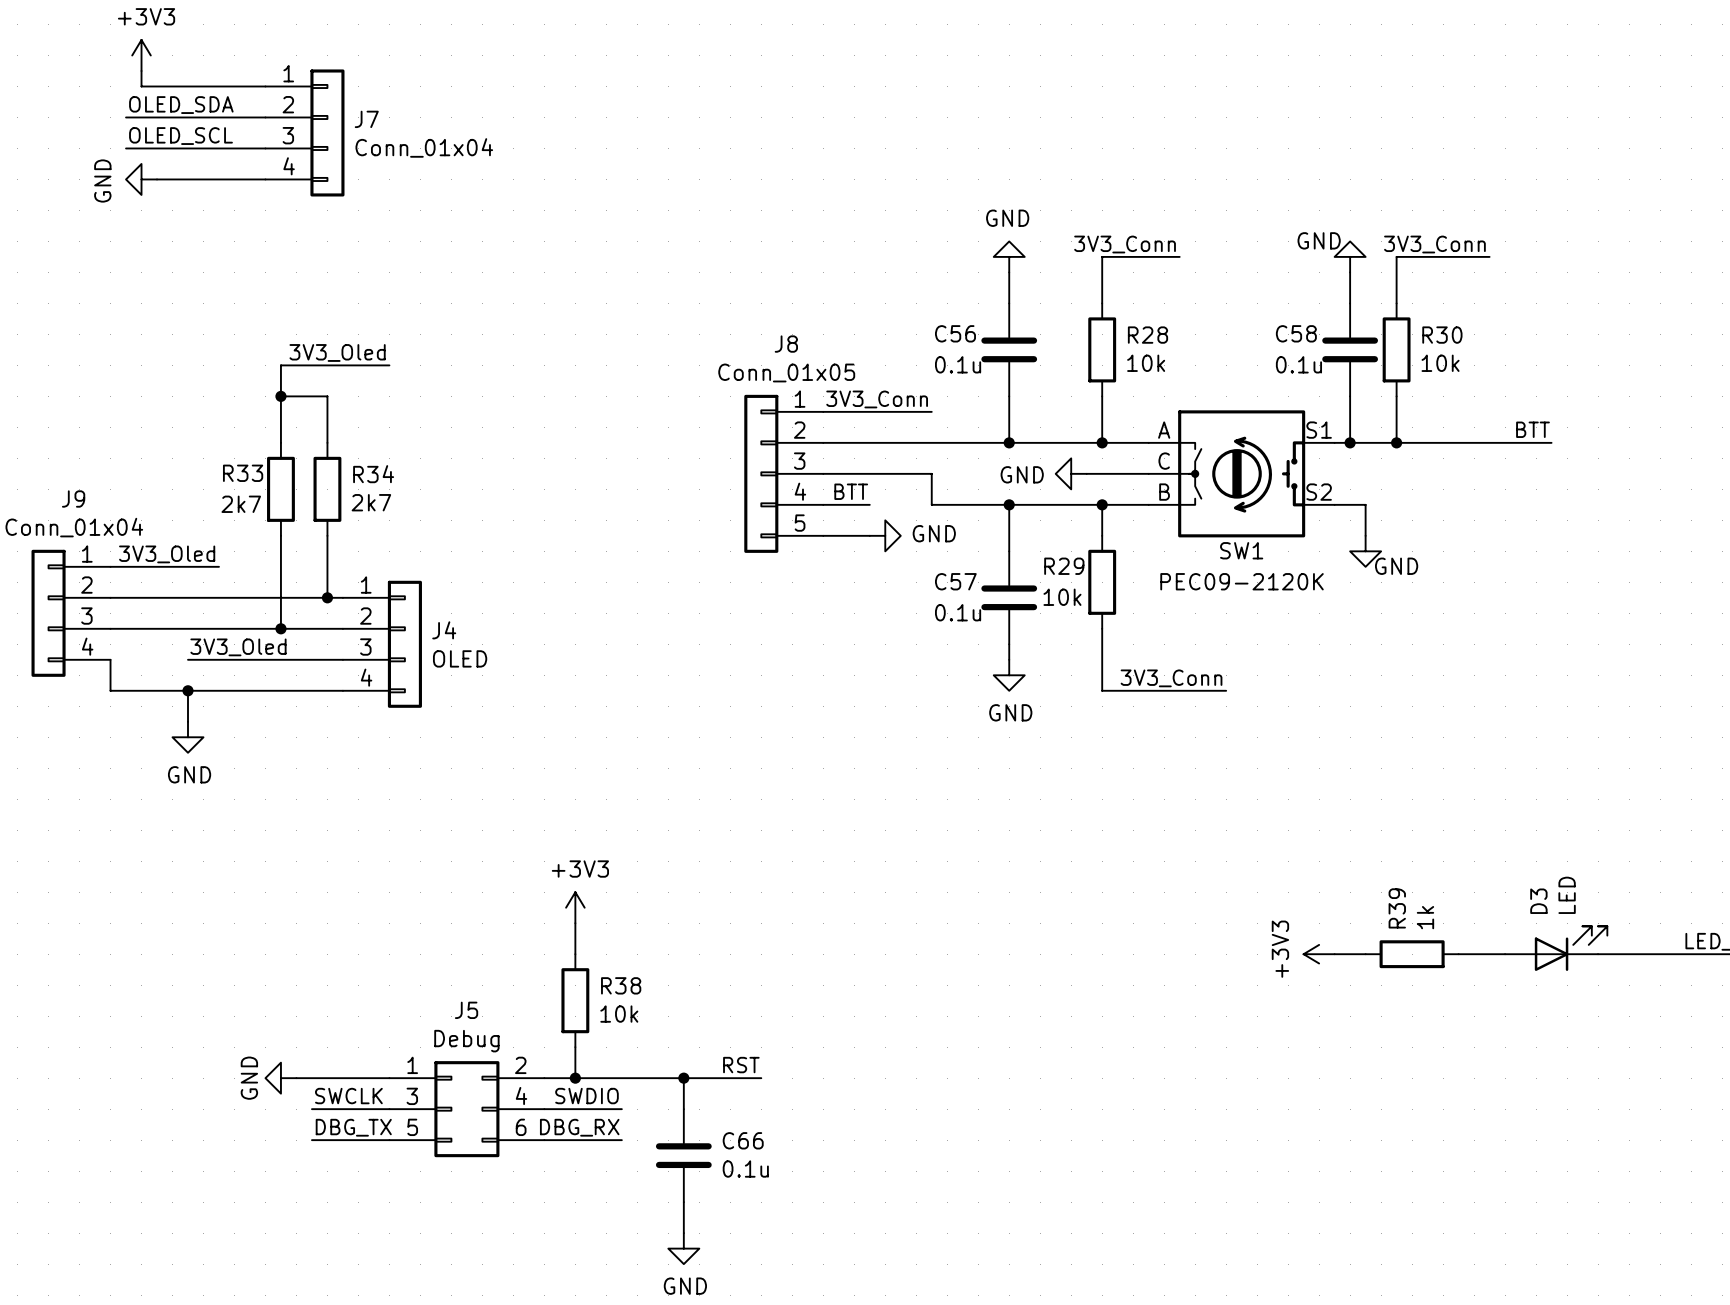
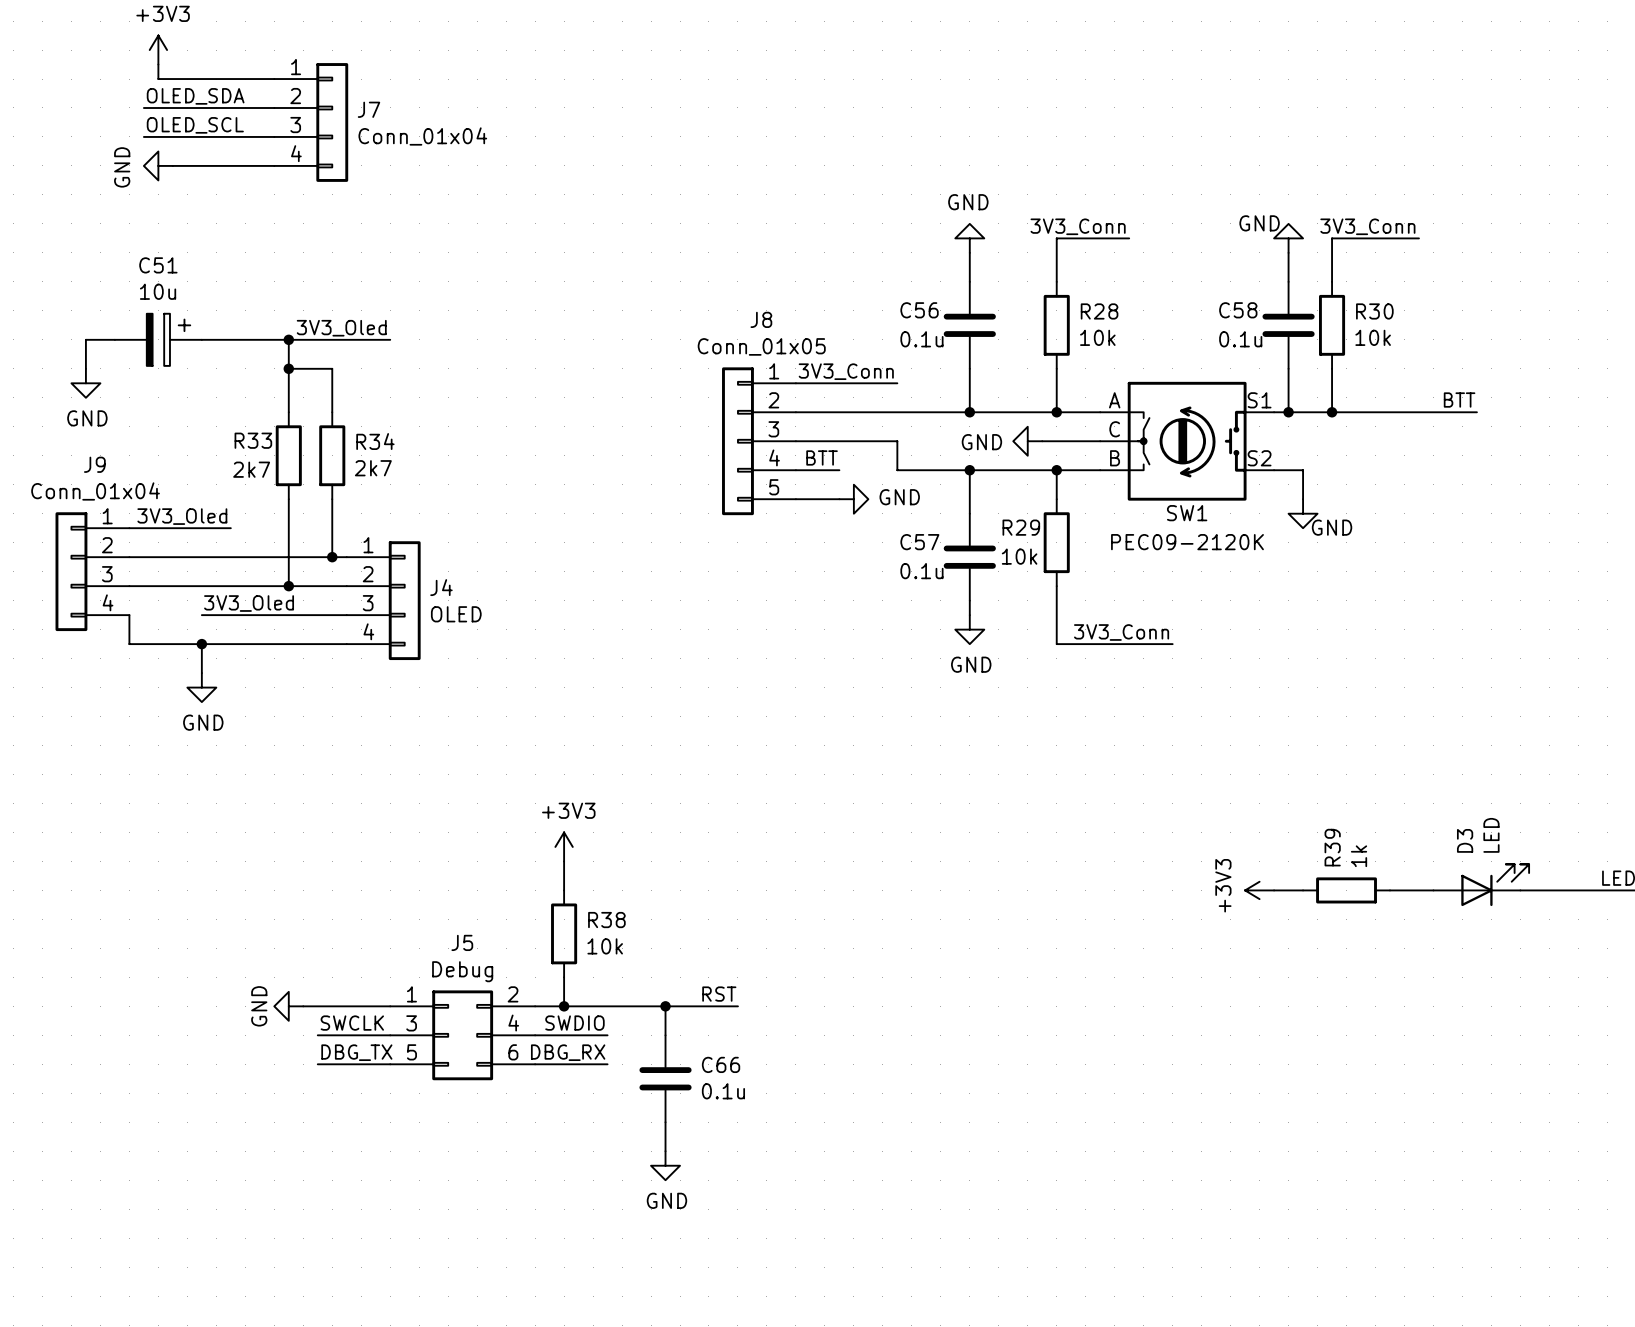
wire: none -> (114, 339) (85, 339) (85, 368)
C51: none -> 10u (158, 339)
wire: none -> (201, 339) (288, 339)
junction: none -> (288, 339)
power symbol: none -> GND (85, 383)

